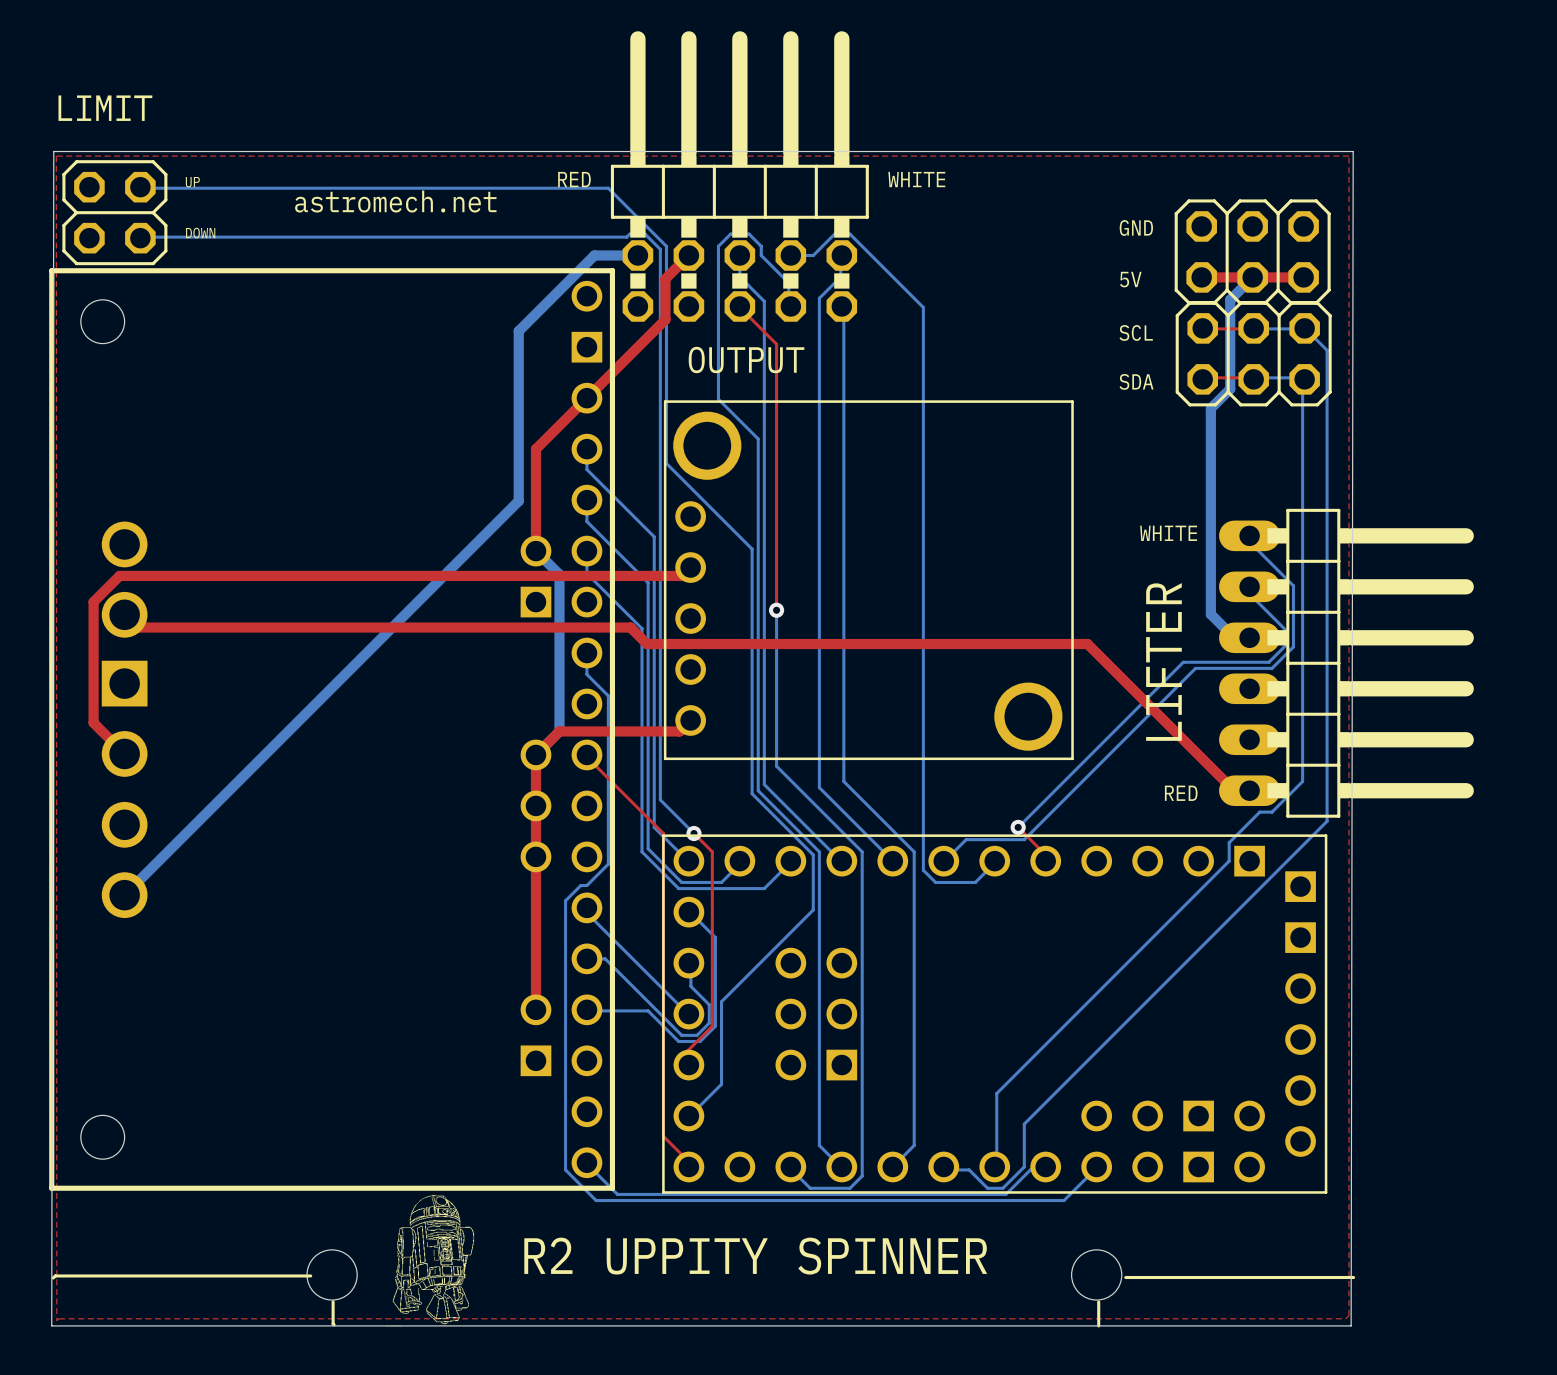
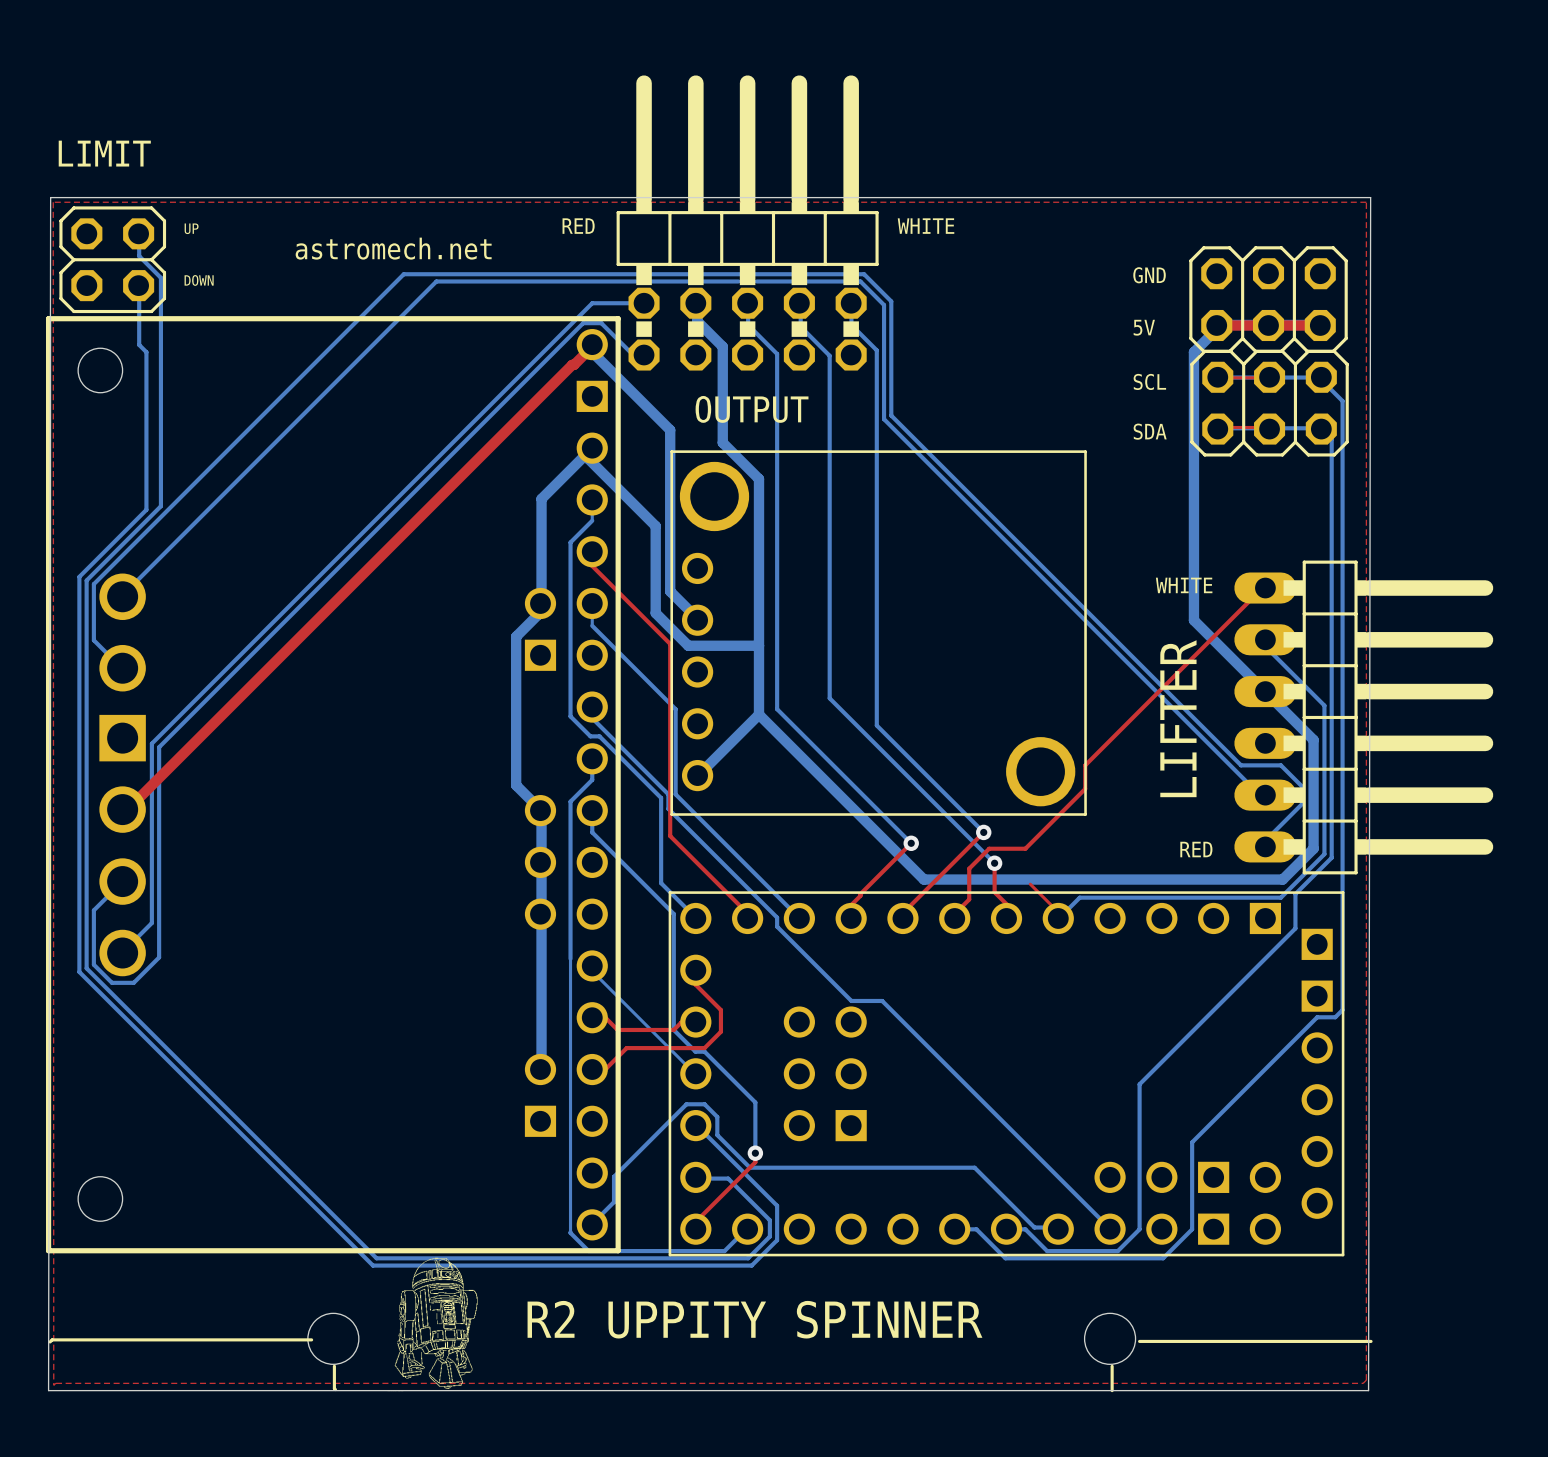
bottom track: (140, 187) (608, 188) (666, 246) (666, 463) (752, 549) (752, 793) (813, 854) (813, 909) (721, 1001) (721, 1084) (688, 1116) -> (138, 233) (139, 256) (160, 277) (160, 506) (86, 580) (86, 968) (376, 1258) (748, 1258) (769, 1236) (769, 1220) (728, 1178) (695, 1177)
bottom track: (629, 234) (626, 237) (140, 238) -> (635, 281) (436, 281) (122, 596)
bottom track: (645, 234) (660, 249) (660, 799) (694, 833) -> (651, 281) (738, 281)
bottom track: (730, 234) (718, 246) (718, 399) (758, 439) (758, 790) (819, 851) (819, 1145) (841, 1166) -> none
bottom track: (749, 234) (761, 246) (761, 255) (788, 283) (788, 304) (790, 306) -> none
bottom track: (834, 234) (813, 255) (792, 255) -> (843, 281) (756, 281)
bottom track: (849, 234) (923, 307) (923, 870) (935, 882) (975, 882) (994, 861) -> (859, 281) (884, 305) (884, 419) (1259, 794) (1265, 795)
bottom track: none -> (138, 285) (139, 344) (146, 352) (146, 509) (79, 576) (79, 971) (372, 1265) (751, 1265) (777, 1240) (777, 1205) (695, 1125)
bottom track: (594, 255) (518, 331) (518, 501) (124, 895) -> (599, 303) (592, 303) (151, 743) (151, 923) (122, 953)
bottom track width: thick (594, 255) (637, 255) -> thin (599, 303) (644, 303)
top track: (688, 255) (665, 278) (665, 319) (535, 449) (535, 551) -> none
bottom track: none -> (695, 303) (697, 303) (697, 321) (722, 346) (722, 442) (759, 479) (759, 714)
bottom track: (739, 255) (739, 276) (764, 301) (764, 784) (841, 861) -> (747, 303) (748, 324) (777, 353) (777, 709) (911, 843)
bottom track: none -> (800, 303) (800, 326) (829, 355) (829, 698) (994, 863)
bottom track: (841, 255) (840, 276) (819, 298) (819, 787) (892, 861) -> (851, 303) (851, 324) (876, 350) (876, 725) (983, 832)
bottom track: (1252, 277) (1230, 299) (1230, 389) (1210, 408) (1210, 614) (1234, 637) (1249, 637) -> none
bottom track: none -> (1320, 325) (1217, 324) (1215, 330) (1193, 352) (1193, 620) (1313, 740) (1313, 848) (1282, 879) (923, 879) (759, 714)
bottom track: none -> (592, 344) (592, 352) (670, 430) (670, 591) (697, 620)
bottom track: none -> (644, 355) (632, 353) (601, 323) (583, 323) (159, 747) (159, 957) (133, 982) (112, 982) (93, 964) (93, 910) (122, 881)
top track: (739, 306) (776, 344) (776, 610) -> none
bottom track: (841, 306) (843, 307) (843, 781) (914, 851) (914, 1145) (892, 1166) -> none
bottom track: (1253, 328) (1304, 328) (1327, 350) (1327, 821) (1024, 1124) (1024, 1166) (1002, 1188) (987, 1188) (969, 1169) (944, 1169) (943, 1166) -> (1217, 377) (1321, 377) (1320, 379) (1342, 401) (1342, 1010) (1335, 1017) (1317, 1017) (1192, 1142) (1192, 1229) (1163, 1258) (1005, 1258) (976, 1229) (954, 1229)
bottom track: (1253, 379) (1253, 377) (1304, 379) (1302, 380) (1302, 781) (1272, 812) (1259, 812) (1229, 842) (1229, 861) (996, 1093) (996, 1166) (994, 1166) -> (1217, 429) (1320, 428) (1331, 439) (1331, 857) (1295, 894) (1295, 928) (1139, 1084) (1139, 1229) (1117, 1251) (1047, 1251) (1025, 1229) (1006, 1229)
bottom track: (586, 469) (654, 536) (654, 827) (688, 861) -> (592, 520) (570, 542) (570, 716) (590, 736) (599, 736) (661, 797) (661, 883) (695, 918)
top track: none -> (592, 551) (592, 566) (670, 643) (670, 836) (746, 912) (747, 918)
bottom track: (586, 500) (586, 521) (648, 582) (648, 848) (681, 882) (721, 882) (739, 864) (739, 861) -> none
top track: none -> (1265, 588) (1261, 589) (1085, 765) (1085, 788) (1025, 848) (989, 848) (969, 868) (969, 899) (954, 913) (954, 918)
bottom track: (1249, 535) (1250, 542) (1293, 585) (1293, 646) (1272, 668) (1195, 668) (1024, 839) (966, 839) (943, 861) -> none
bottom track: (535, 551) (559, 574) (559, 731) (535, 754) -> none
top track: (690, 567) (682, 575) (119, 575) (93, 601) (93, 722) (124, 753) -> (592, 344) (592, 346) (128, 808) (122, 809)
bottom track: (586, 573) (642, 628) (642, 851) (678, 888) (764, 888) (790, 861) -> (592, 625) (675, 709) (675, 794) (799, 918)
bottom track: none -> (759, 645) (688, 645) (655, 613) (655, 526) (588, 459) (592, 448) (541, 498) (541, 602) (537, 607) (537, 614) (516, 636) (516, 785) (541, 810) (540, 1069)
bottom track: (1250, 594) (1287, 631) (1287, 643) (1268, 662) (1183, 662) (1018, 827) -> (1266, 647) (1324, 705) (1324, 854) (1280, 897) (1079, 897) (1058, 918)
bottom track: (776, 610) (776, 766) (862, 851) (862, 1176) (849, 1188) (810, 1188) (790, 1166) -> none
via: (776, 610) -> none
top track: (124, 614) (137, 627) (630, 627) (647, 644) (1087, 644) (1234, 790) (1249, 790) -> none
bottom track: none -> (122, 668) (93, 640) (93, 584) (403, 274) (864, 274) (891, 301) (891, 415) (1241, 765) (1280, 765) (1302, 787) (1302, 803) (1266, 839) (1265, 846)
bottom track: none -> (759, 714) (697, 775)
bottom track: (586, 664) (586, 674) (608, 695) (608, 864) (586, 885) (580, 885) (565, 900) -> (592, 758) (592, 779) (570, 801) (570, 958)
bottom track: none -> (592, 718) (668, 794) (668, 808) (777, 917) (777, 926) (851, 1000) (882, 1000) (1110, 1229)
top track: (690, 720) (679, 731) (559, 731) (535, 754) (535, 1009) -> none
top track: (586, 754) (663, 833) (663, 1136) (687, 1160) (688, 1166) -> (755, 1153) (755, 1162) (697, 1220) (695, 1229)
bottom track: none -> (592, 810) (592, 832) (673, 913) (673, 1029) (695, 1051) (704, 1051) (755, 1102) (755, 1153)
top track: none -> (983, 832) (903, 912) (902, 918)
via: none -> (983, 832)
top track: none -> (911, 843) (851, 904) (851, 918)
via: none -> (911, 843)
top track: none -> (994, 863) (994, 892) (1007, 904) (1006, 918)
via: none -> (994, 863)
via: (1018, 827) -> none
top track: (694, 833) (712, 851) (712, 1026) (687, 1050) (688, 1065) -> none
via: (694, 833) -> none
top track: none -> (695, 970) (695, 984) (720, 1010) (720, 1031) (704, 1048) (626, 1048) (606, 1068) (592, 1069)
bottom track: (688, 912) (715, 937) (715, 1026) (700, 1041) (678, 1041) (648, 1010) (586, 1009) -> none
top track: none -> (592, 1017) (606, 1019) (617, 1029) (673, 1029) (681, 1022) (695, 1022)
bottom track: (586, 958) (605, 958) (681, 1035) (697, 1035) (709, 1023) (709, 1004) (690, 986) (690, 965) (688, 963) -> none
via: none -> (755, 1153)
bottom track: (586, 1162) (617, 1194) (1005, 1194) (1030, 1169) (1045, 1169) (1045, 1166) -> (592, 1224) (614, 1202) (614, 1176) (686, 1104) (704, 1104) (717, 1116) (717, 1135) (749, 1167) (974, 1167) (1034, 1227) (1058, 1227) (1058, 1229)
bottom track: (1096, 1166) (1064, 1200) (596, 1200) (565, 1169) -> (747, 1229) (724, 1251) (588, 1251) (570, 1232)

